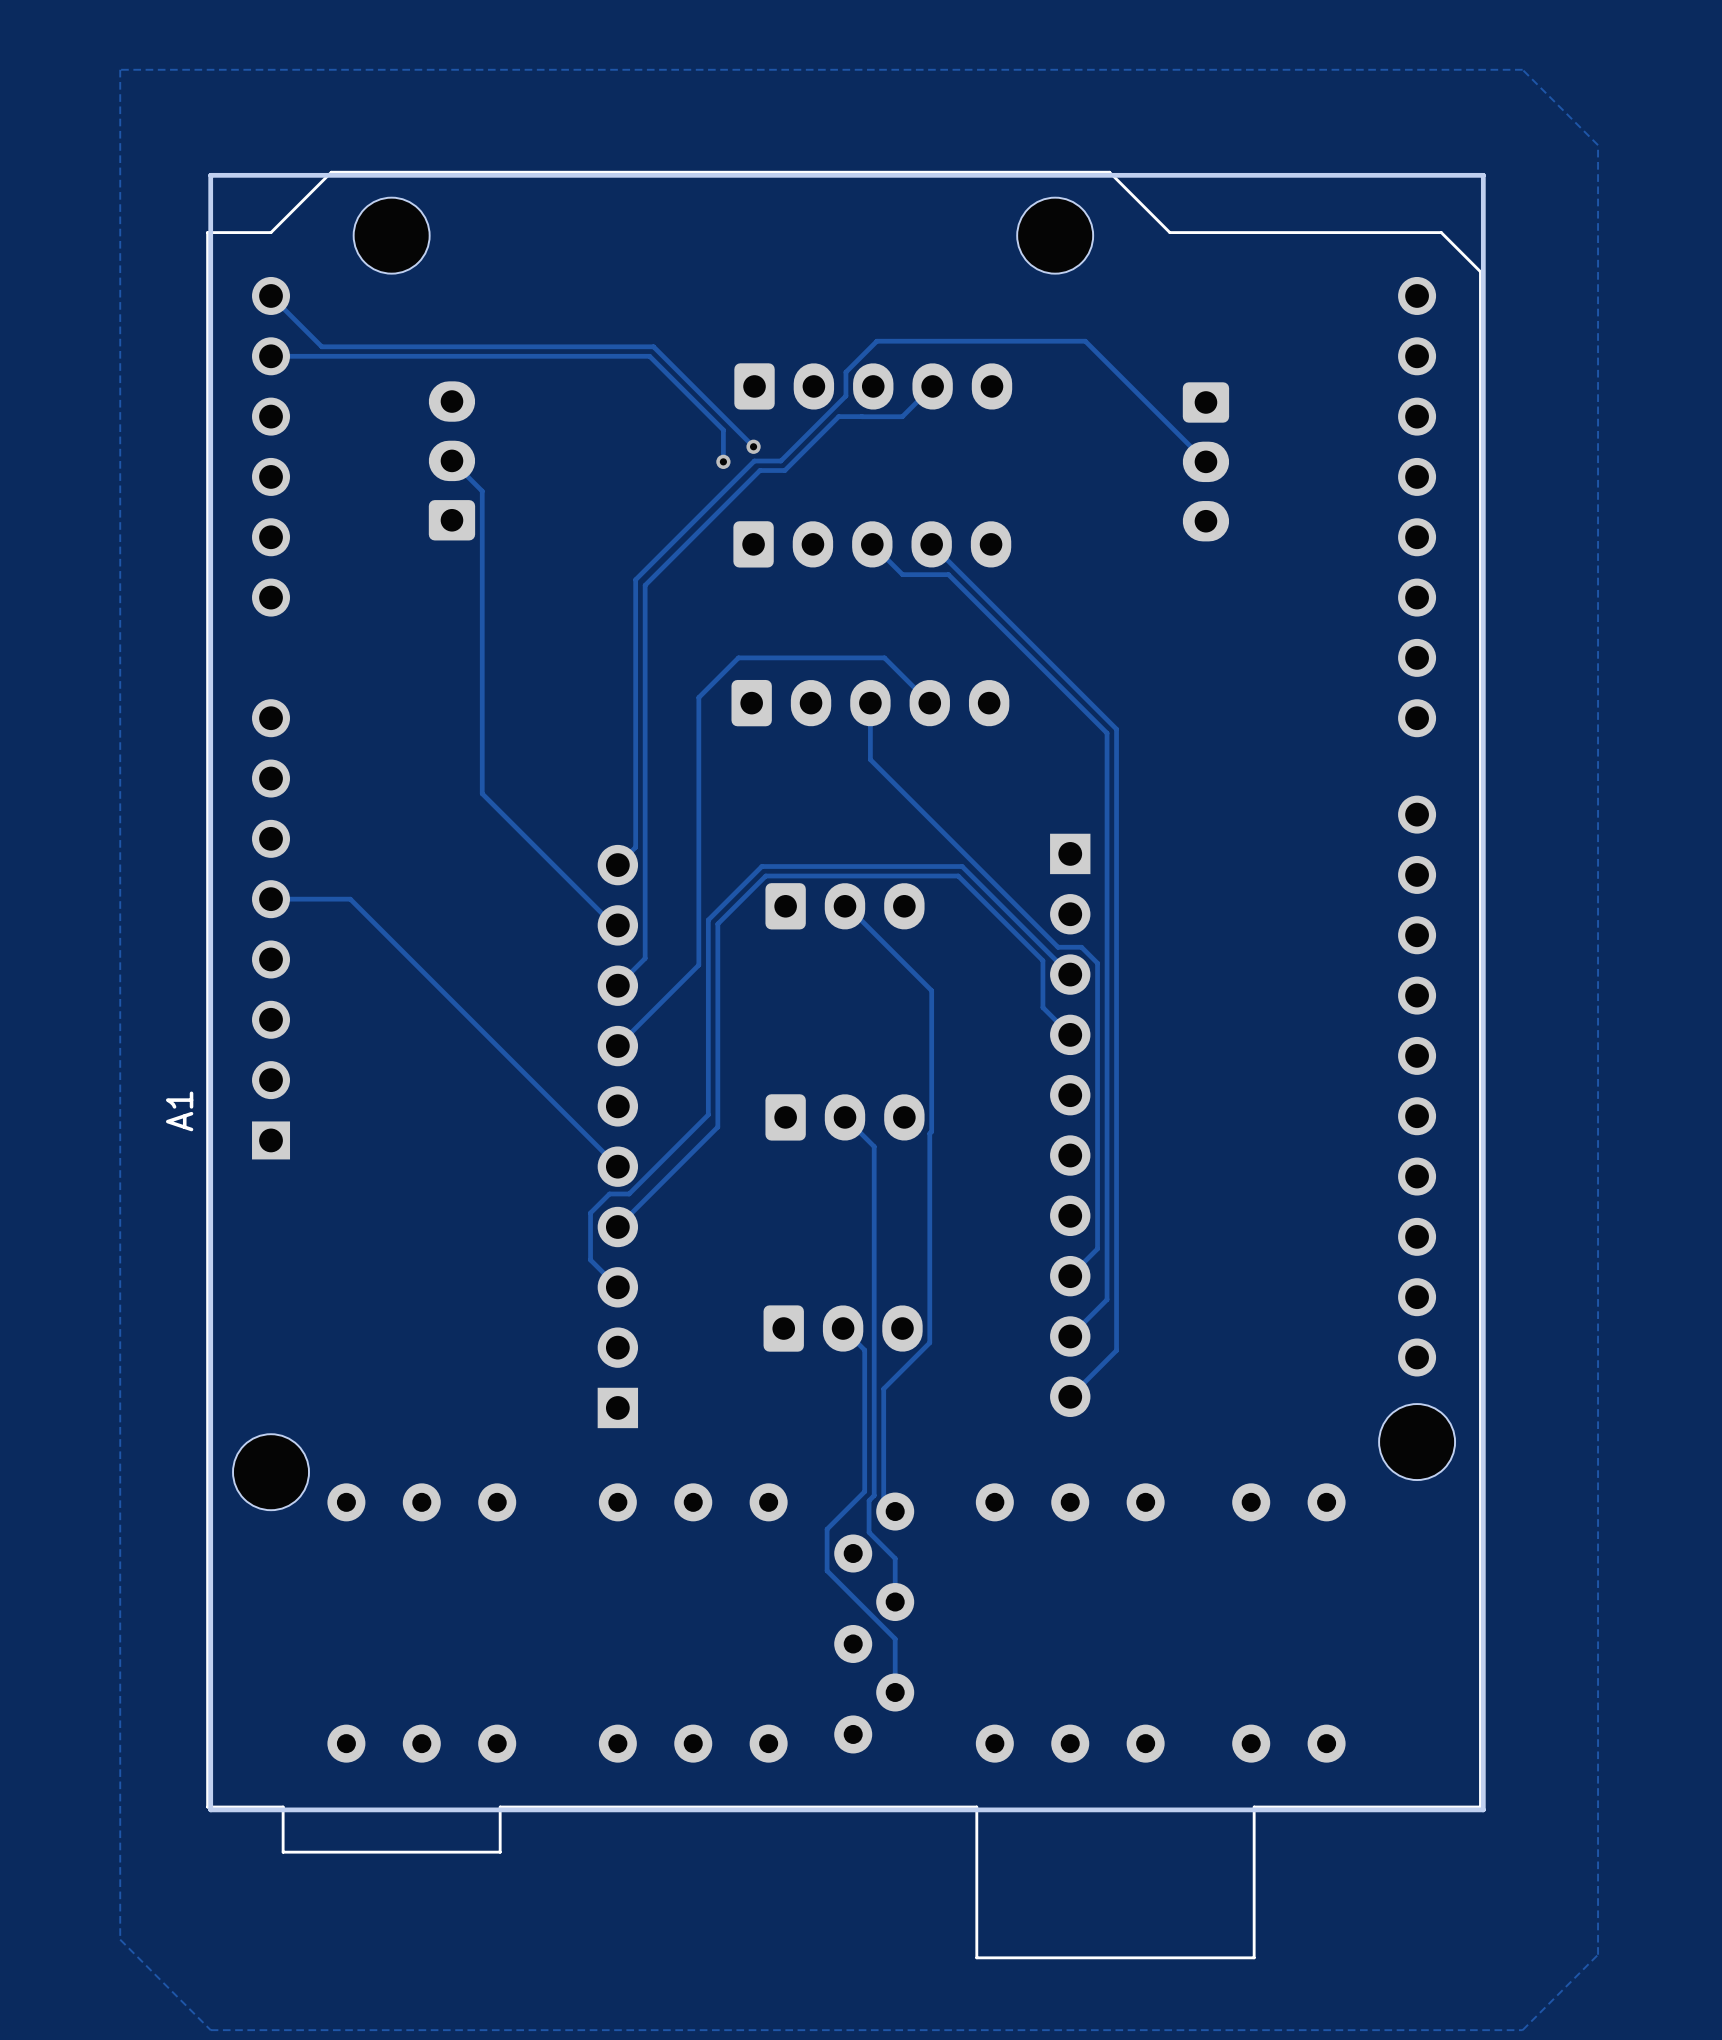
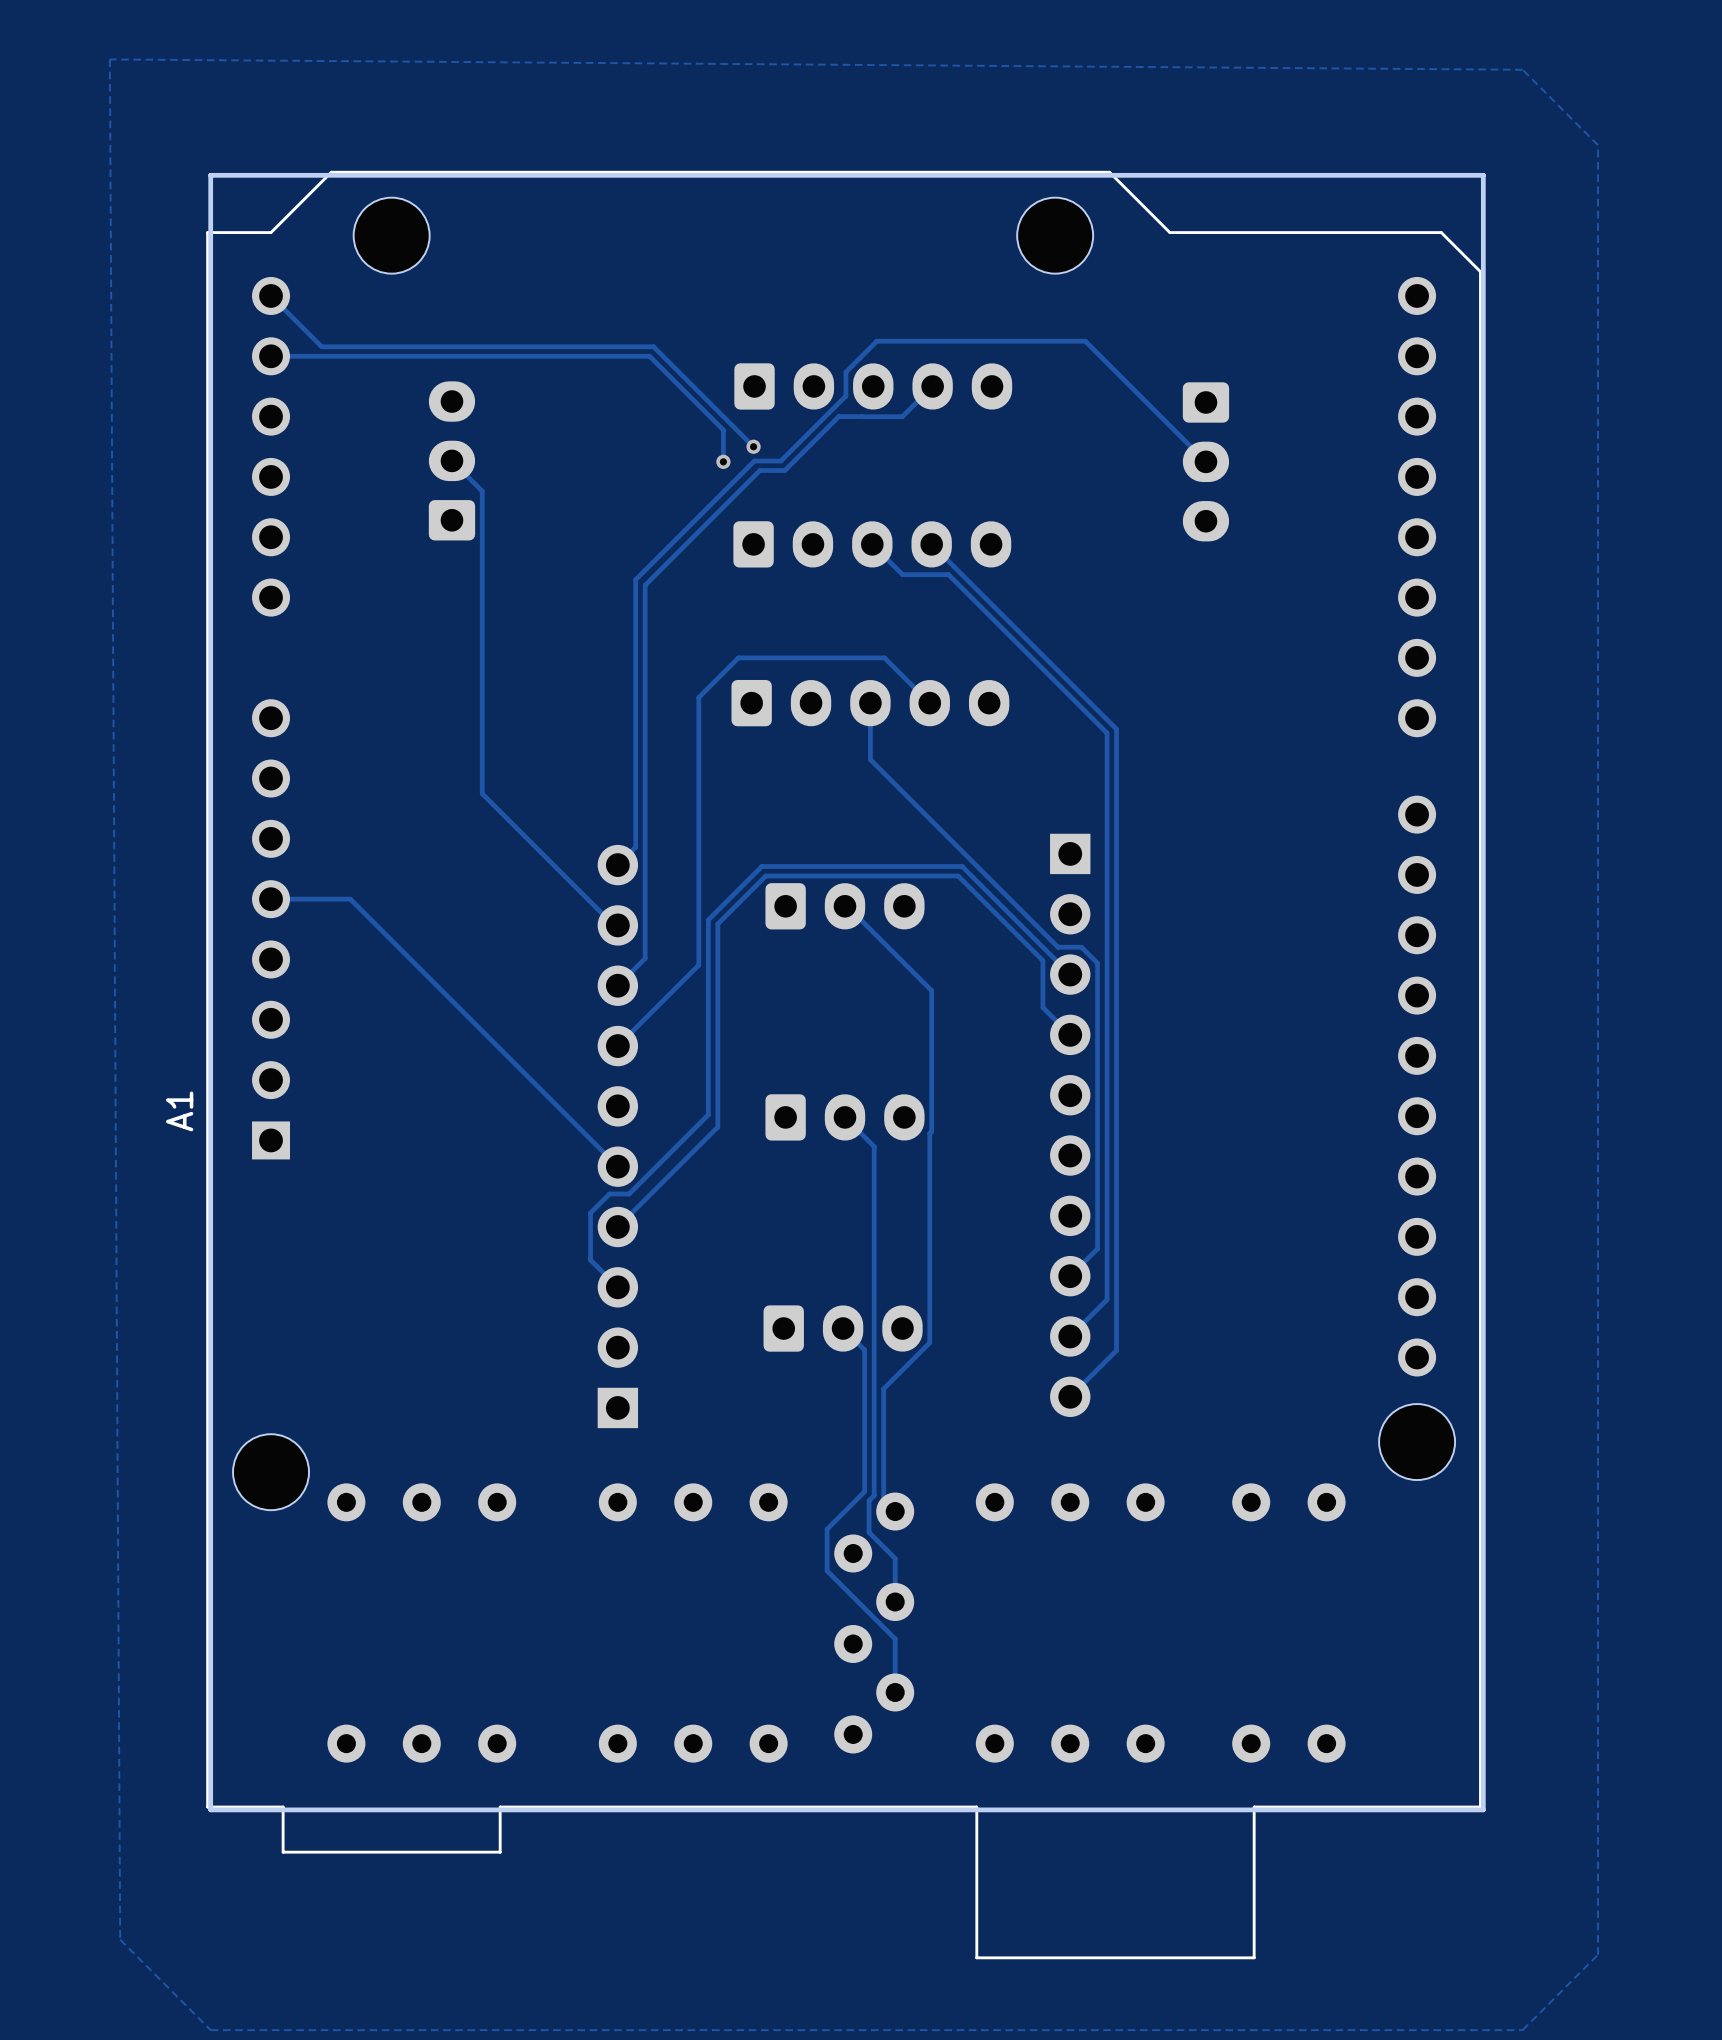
zone outline: (1522, 69) (120, 69) (120, 1939) -> (1522, 69) (109, 59) (120, 1939)

